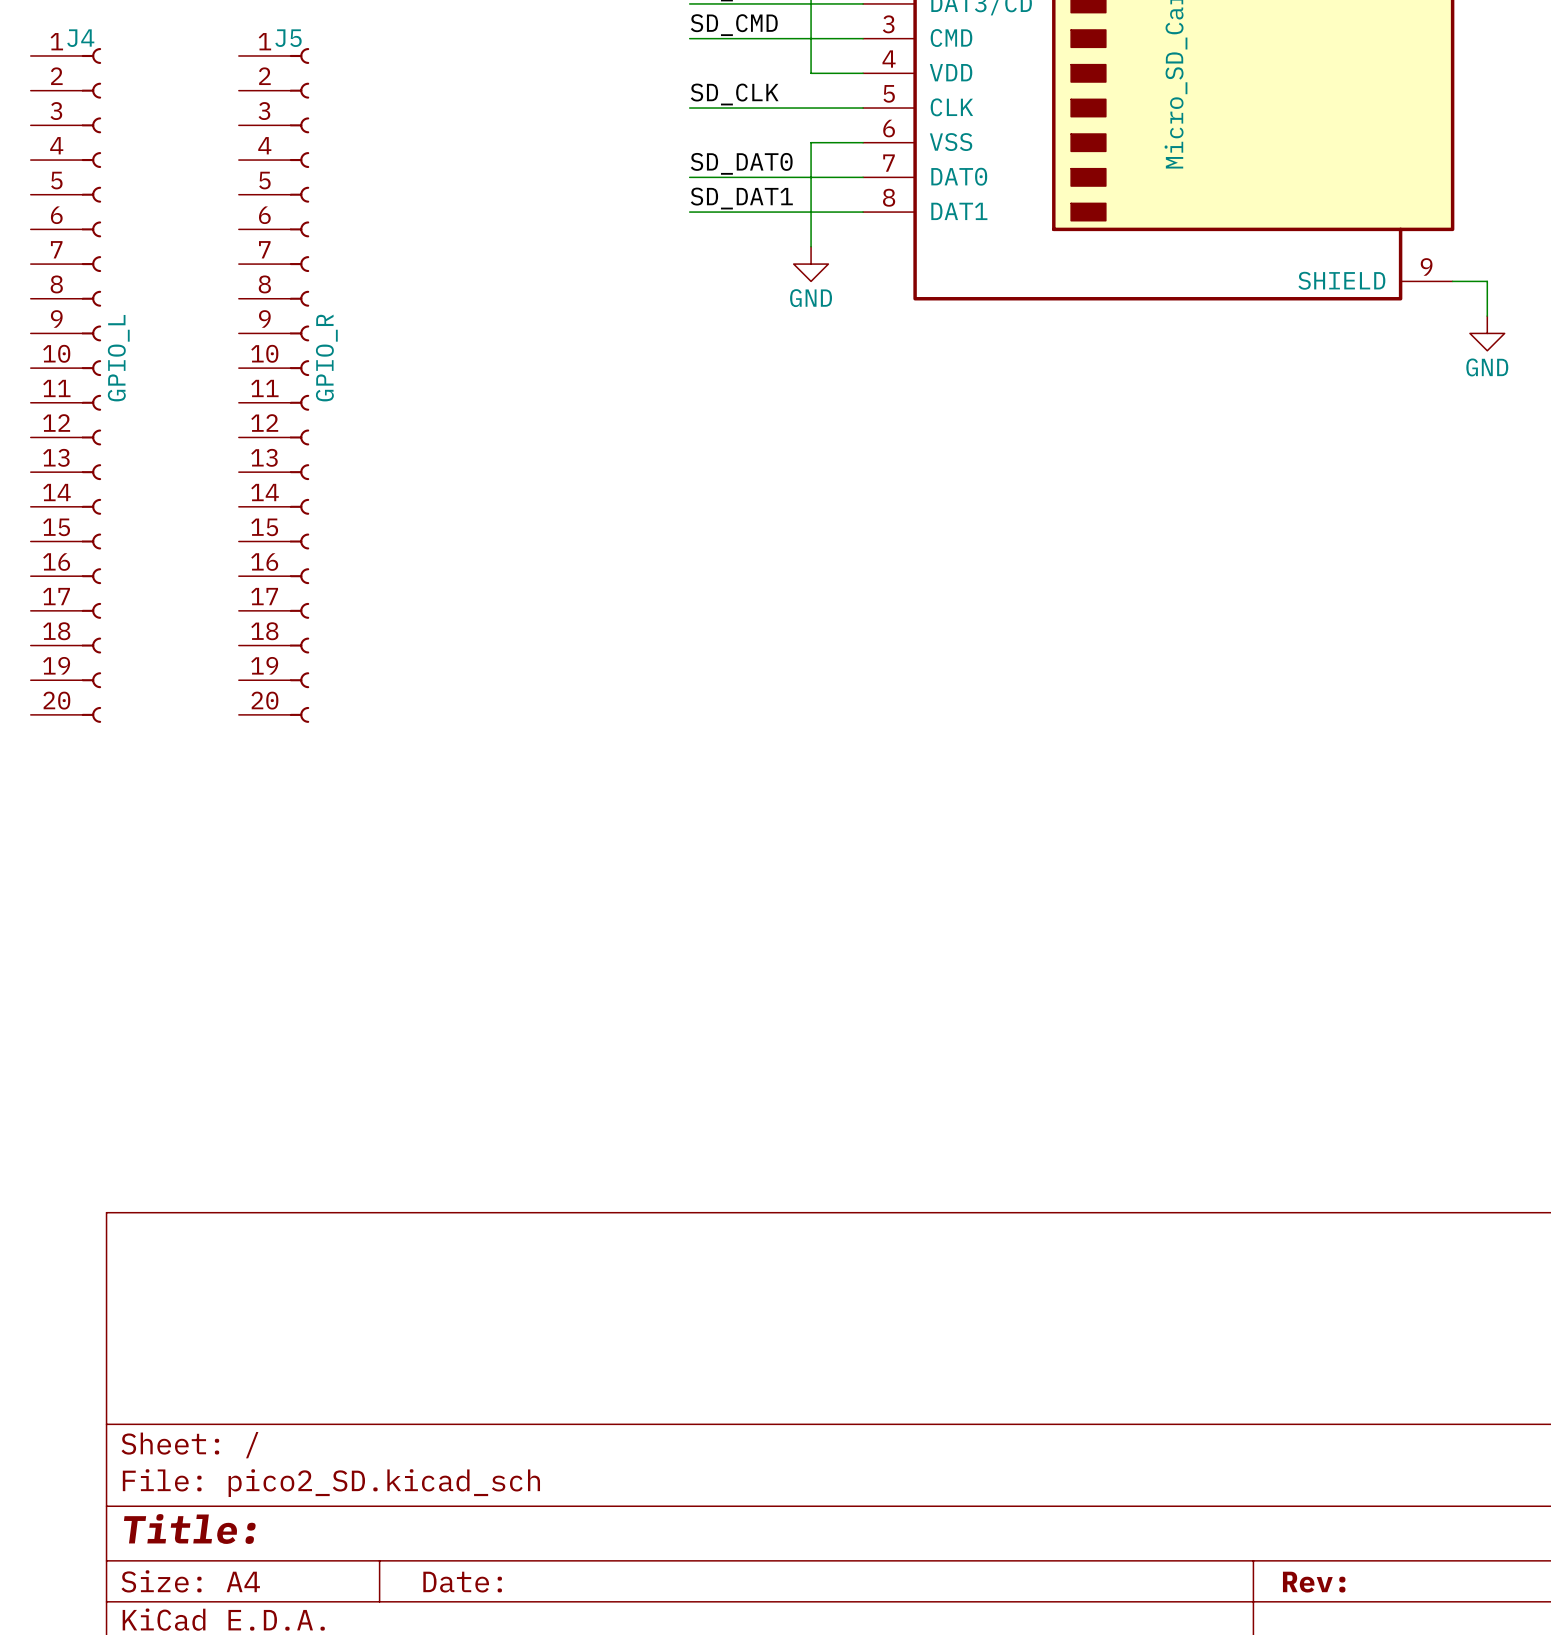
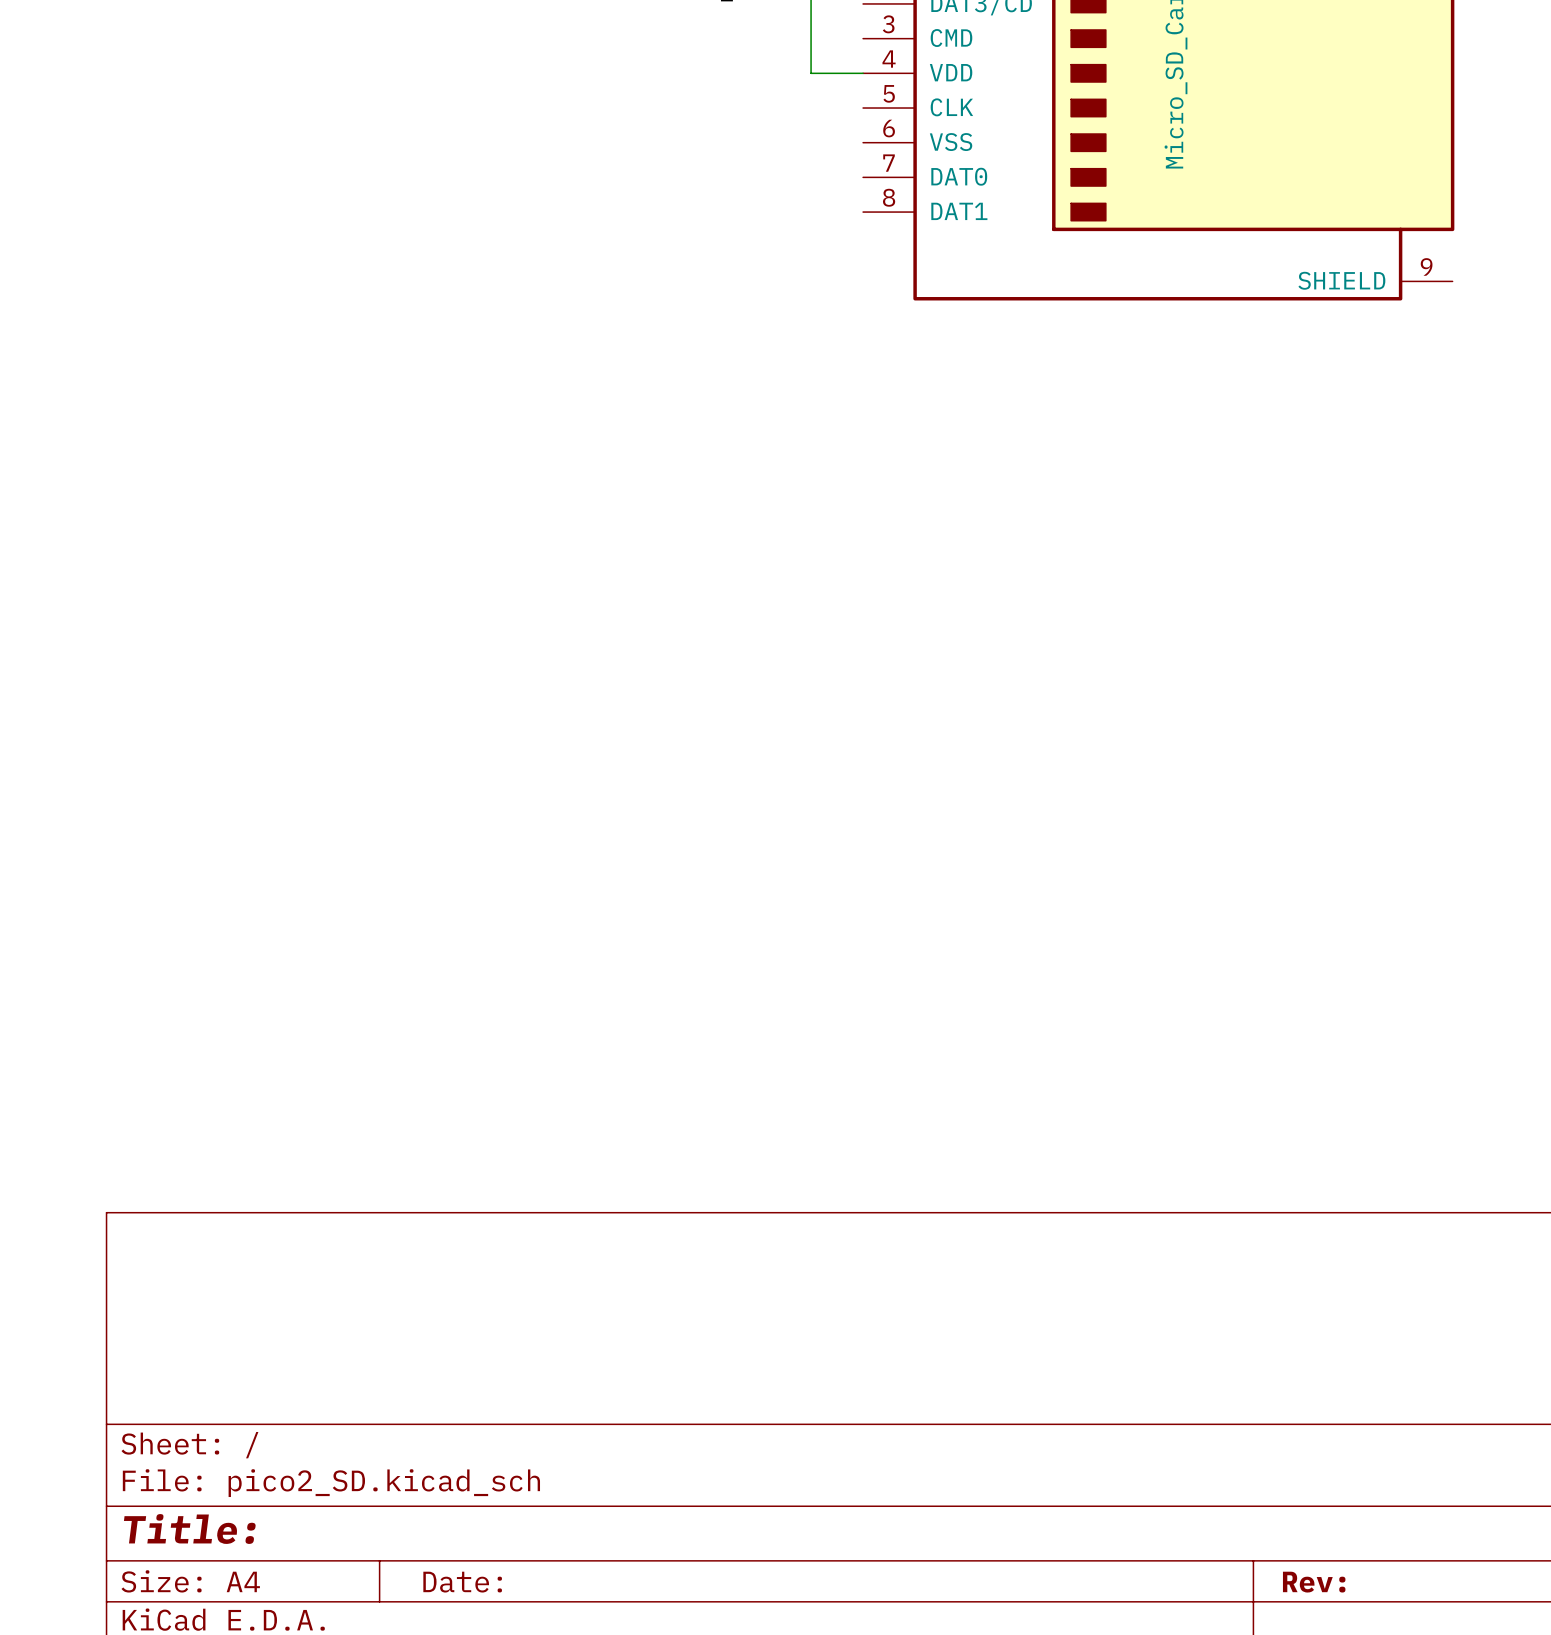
wire: (689, 3) (863, 3) -> none
label: SD_CMD (734, 25) -> none
wire: (689, 38) (863, 38) -> none
label: SD_CLK (734, 94) -> none
wire: (689, 108) (863, 108) -> none
wire: (863, 142) (811, 142) (811, 246) -> none
label: SD_DAT0 (741, 163) -> none
wire: (689, 177) (863, 177) -> none
label: SD_DAT1 (741, 198) -> none
wire: (689, 212) (863, 212) -> none
power symbol: GND (811, 264) -> none
wire: (1452, 281) (1487, 281) (1487, 316) -> none
power symbol: GND (1487, 333) -> none
J4: GPIO_L (65, 385) -> none
J5: GPIO_R (274, 385) -> none

